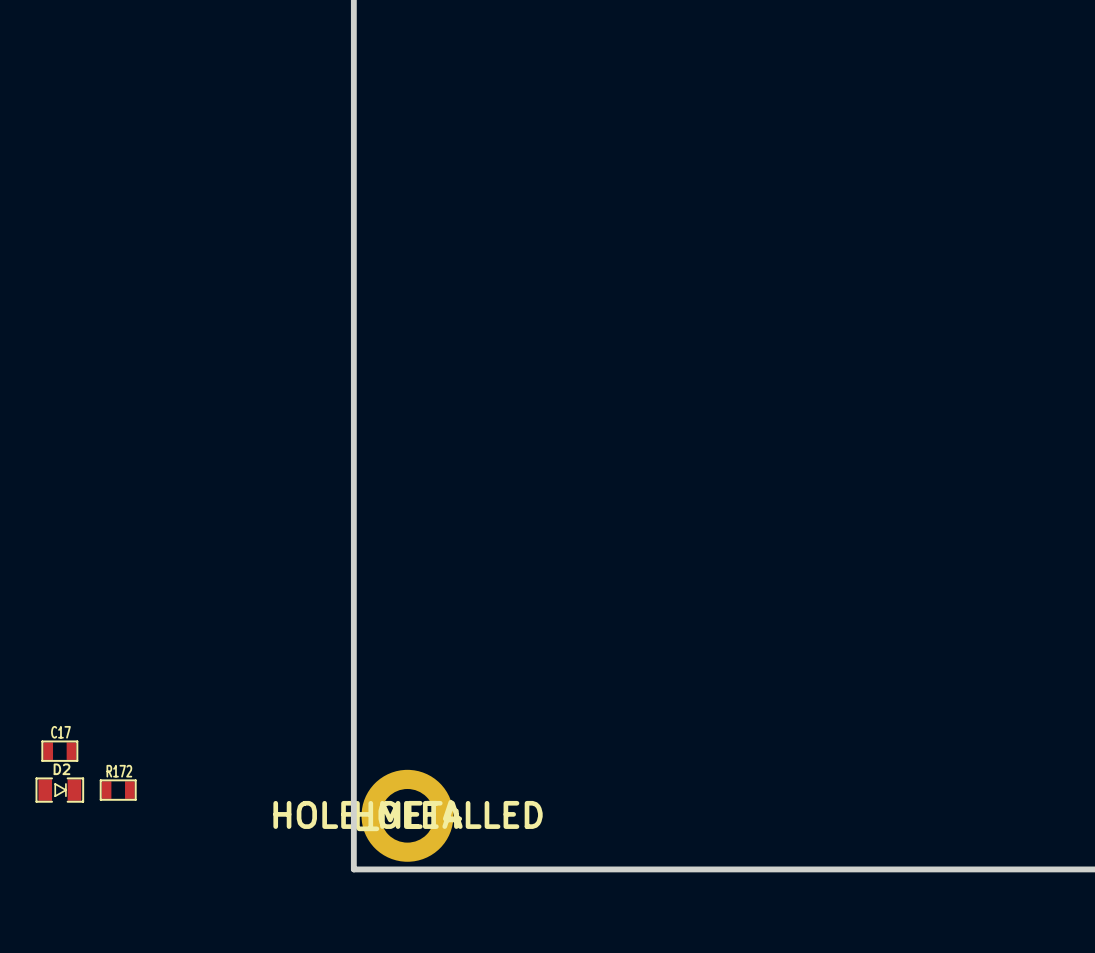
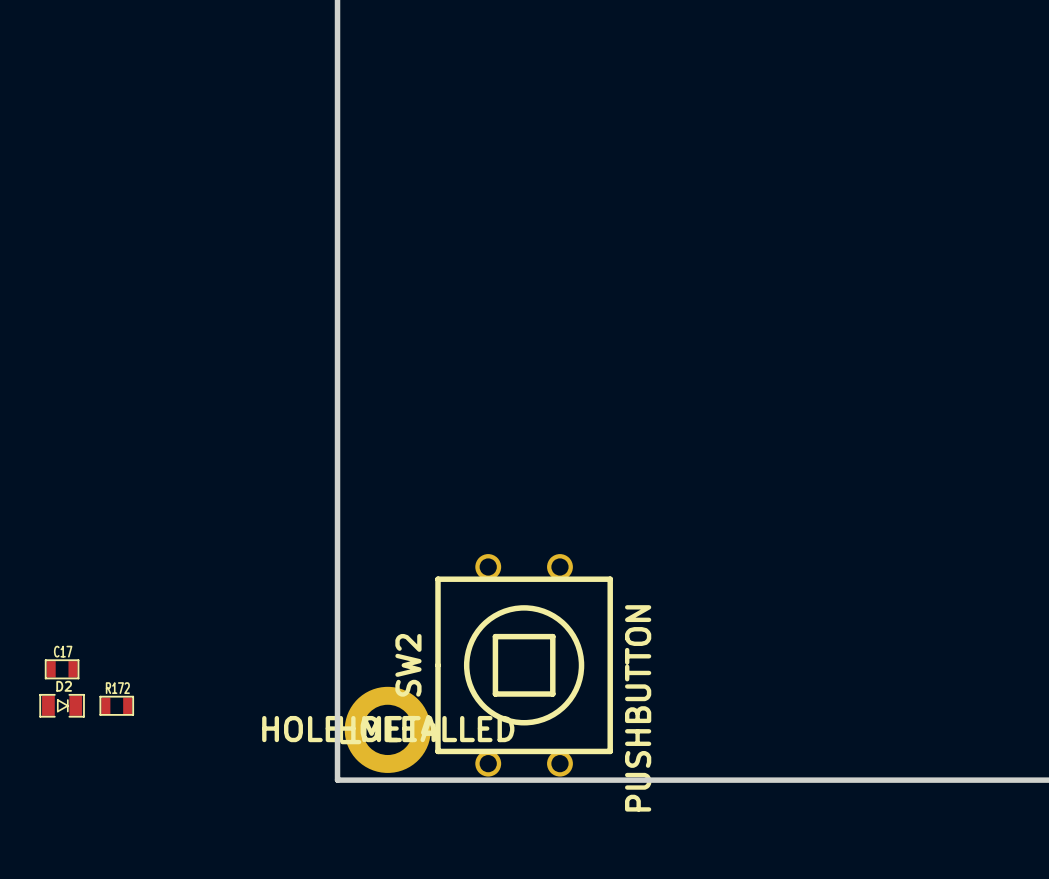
SW2: none -> PUSHBUTTON (524, 665)

